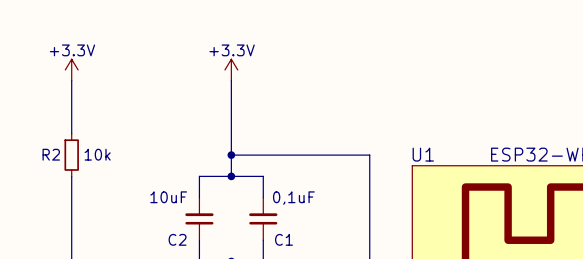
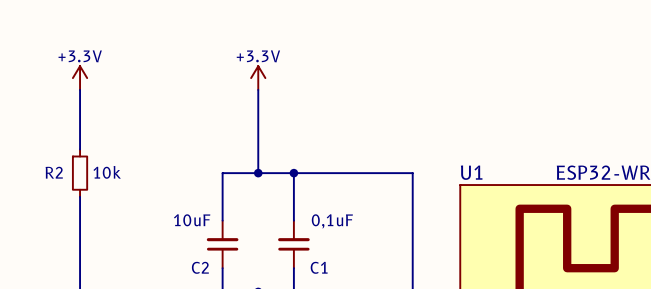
wire: (231, 155) (231, 176) -> (258, 173) (222, 173) (222, 196)
wire: (199, 176) (263, 176) -> (293, 173) (293, 196)
junction position: (231, 176) -> (293, 173)

